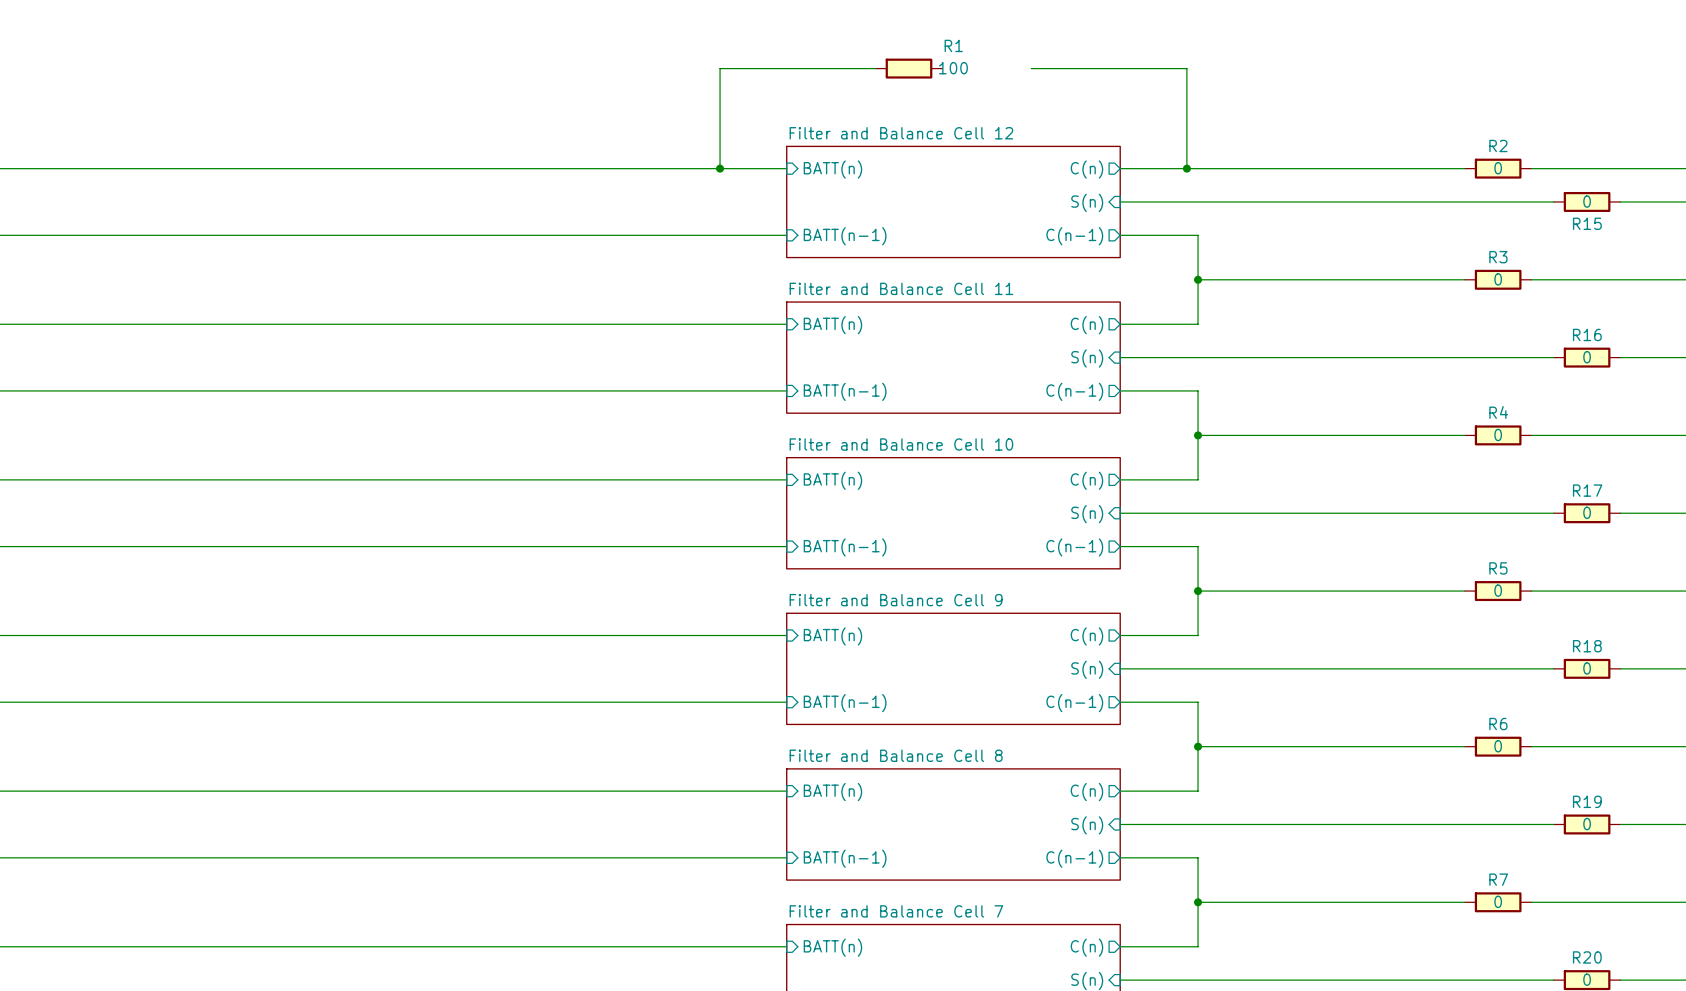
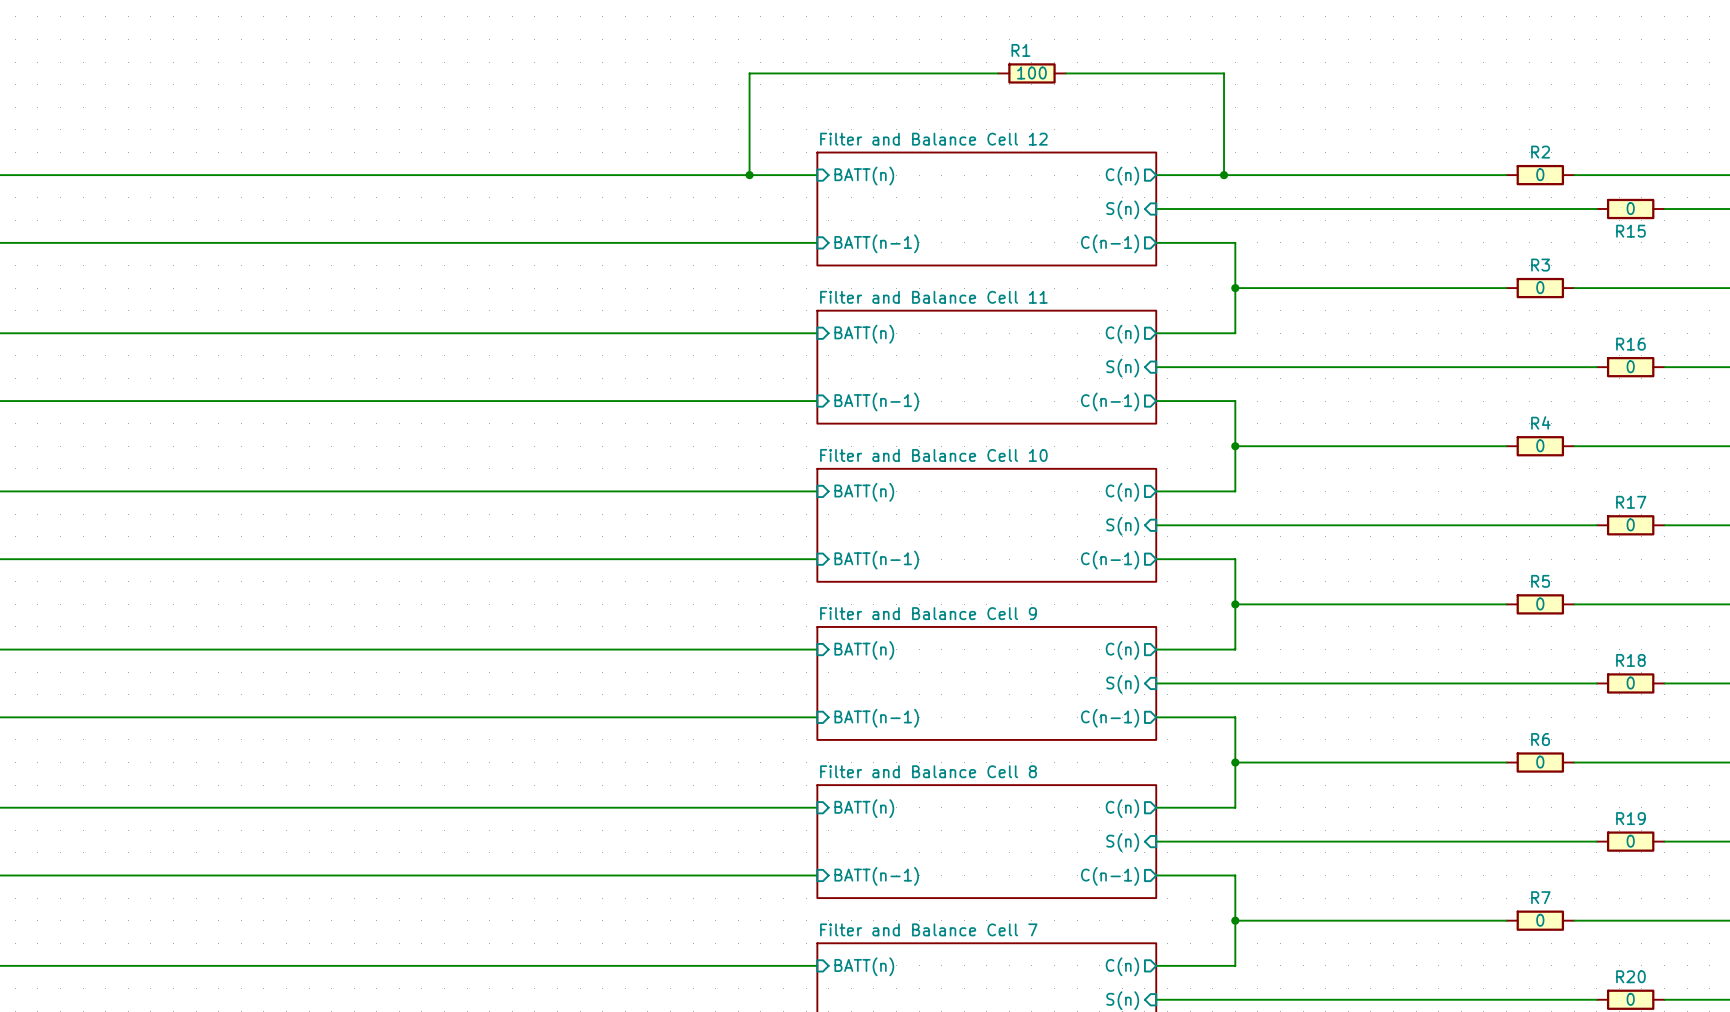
R1 name position: R1 (953, 45) -> R1 (1020, 50)
R1 position: (909, 68) -> (1031, 73)
R1 value position: 100 (953, 68) -> 100 (1031, 73)

